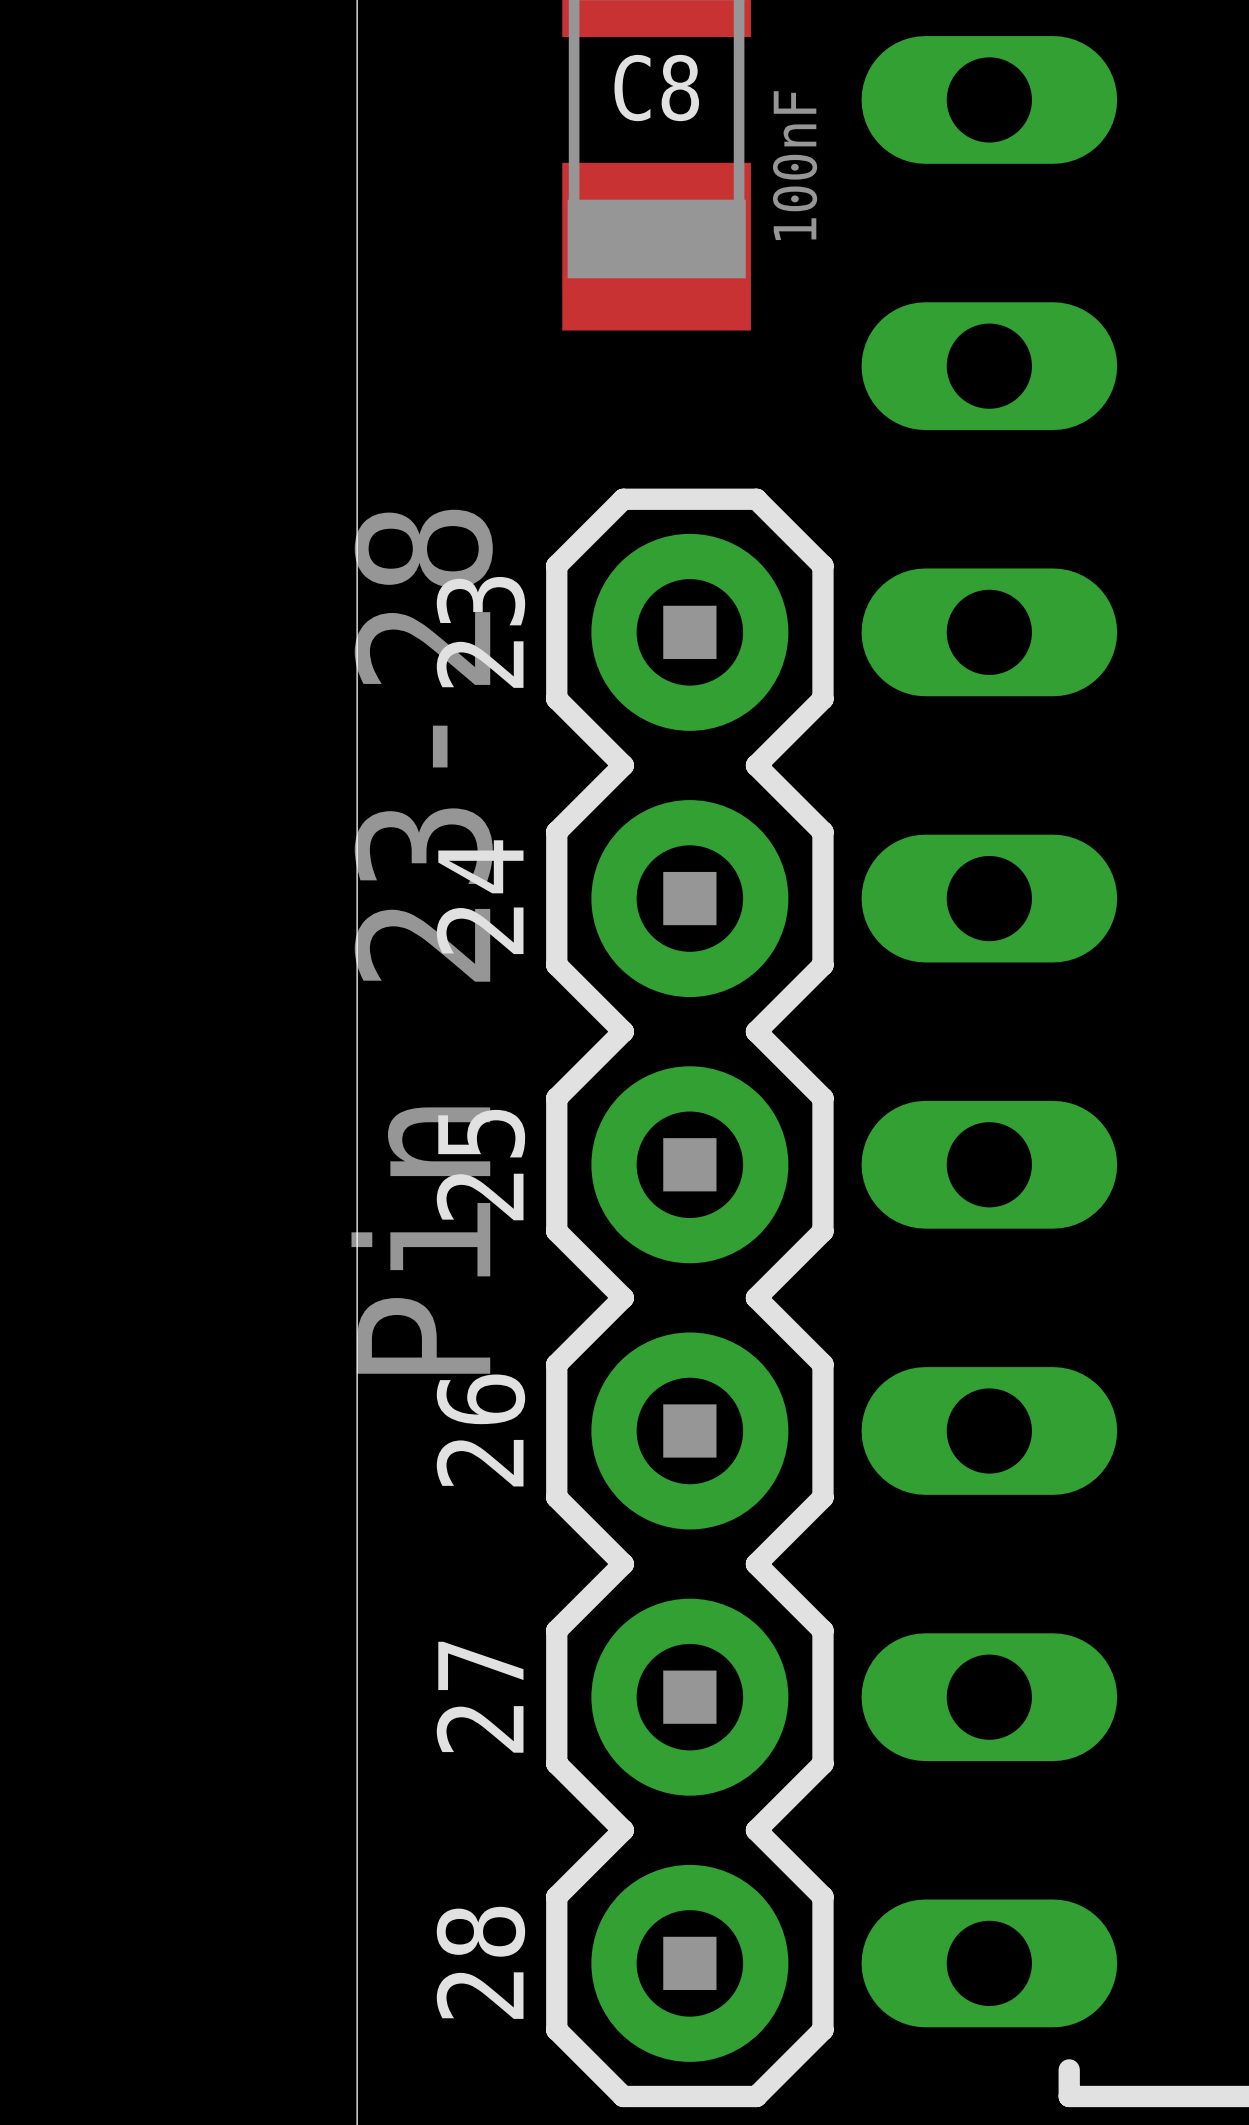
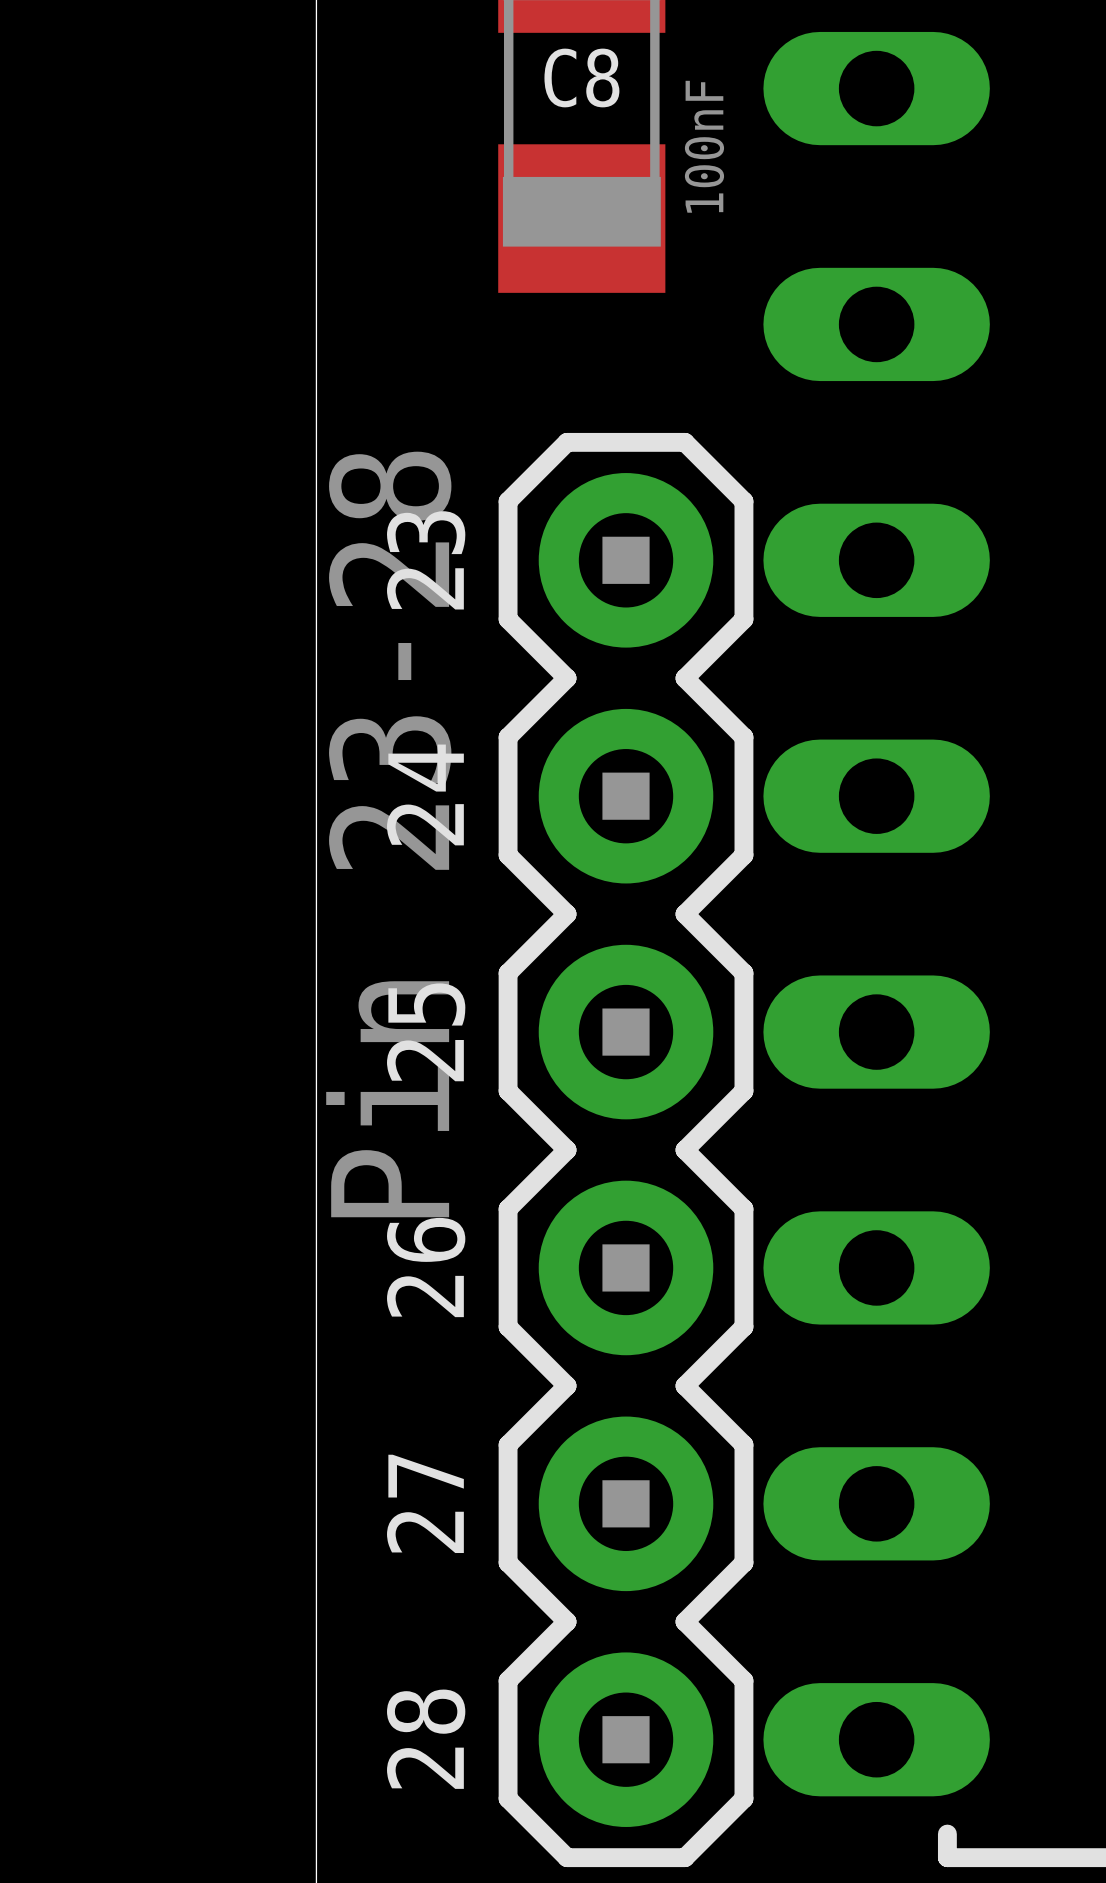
part position: (689, 1297) -> (626, 1150)

